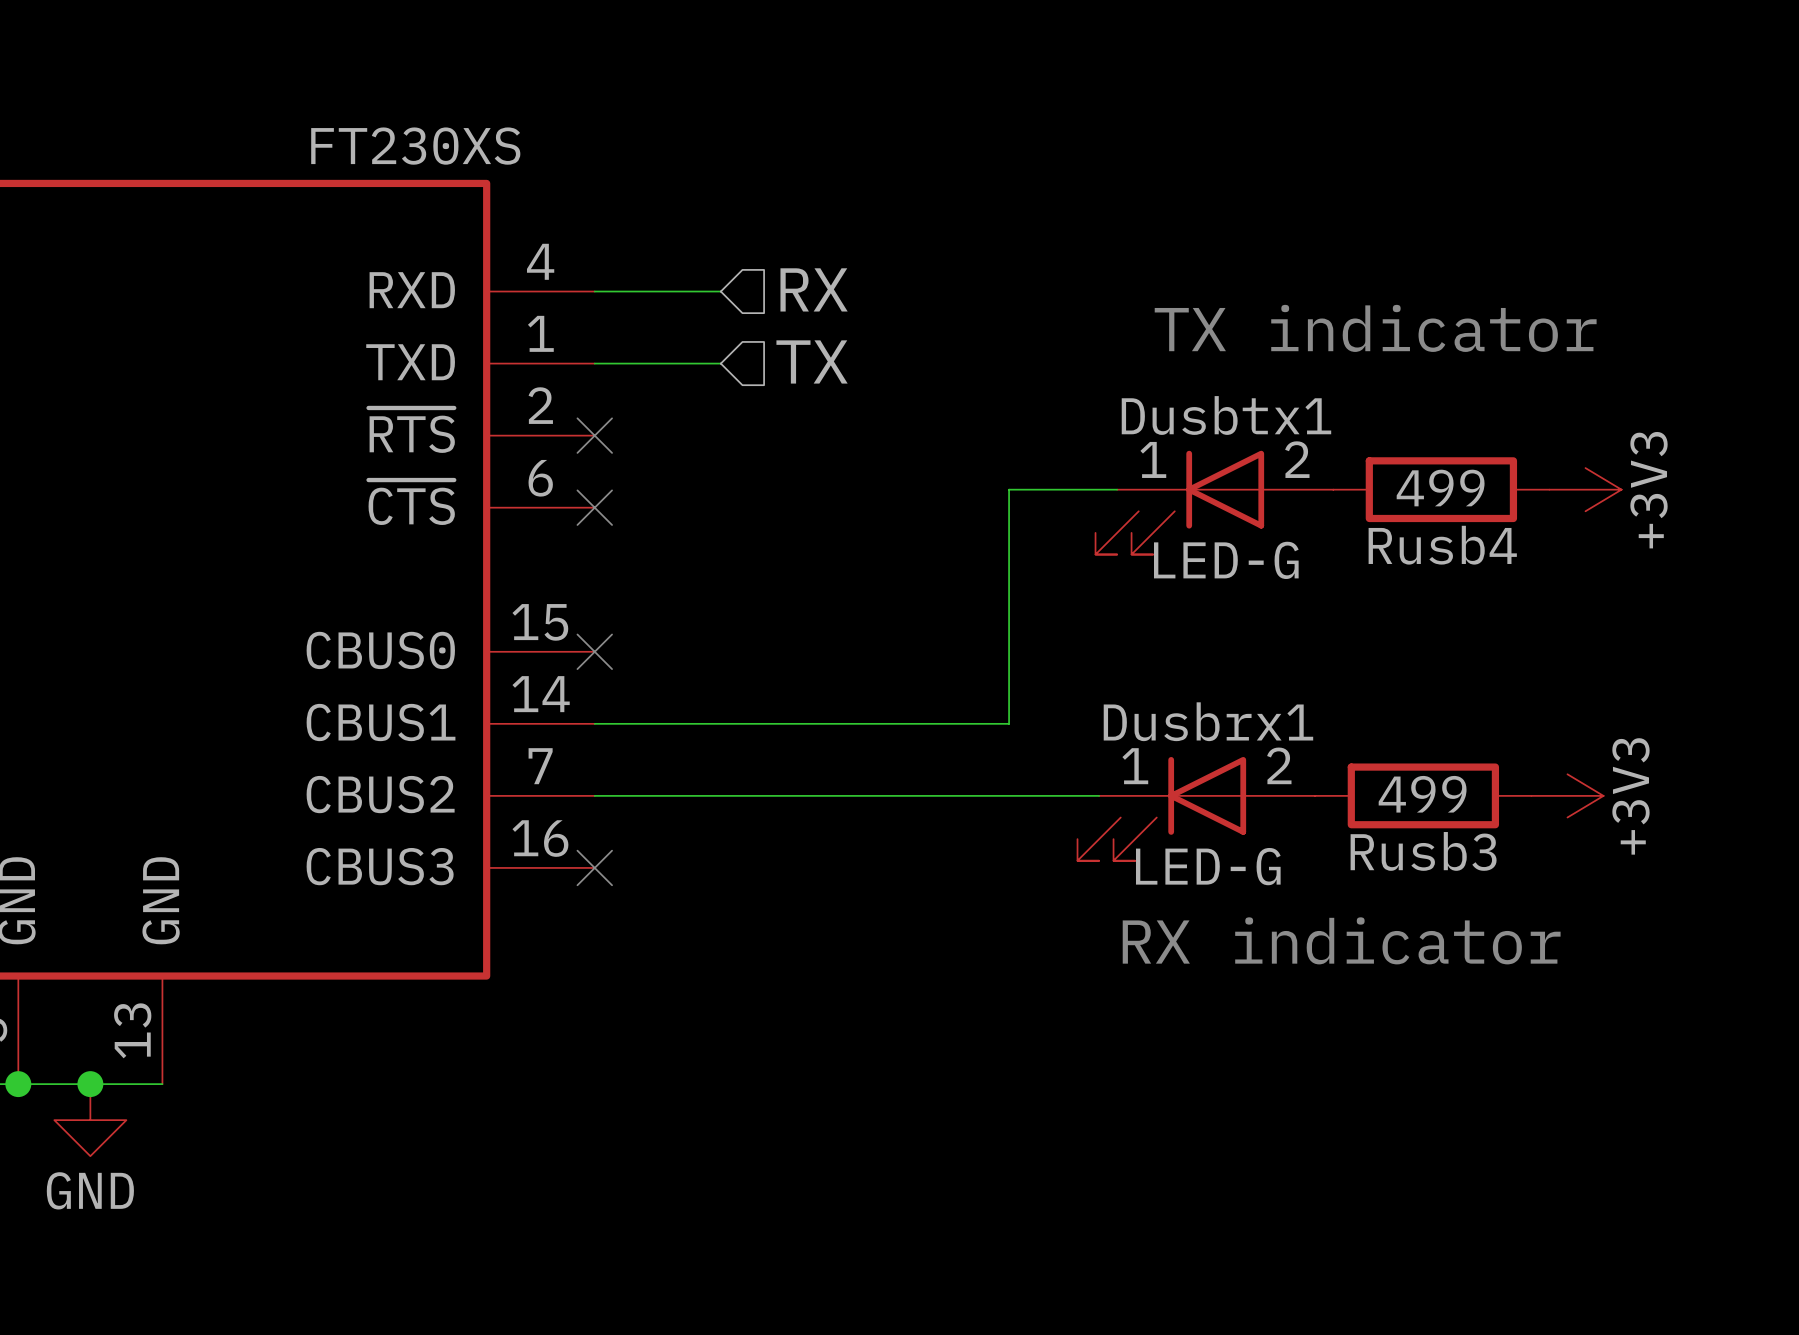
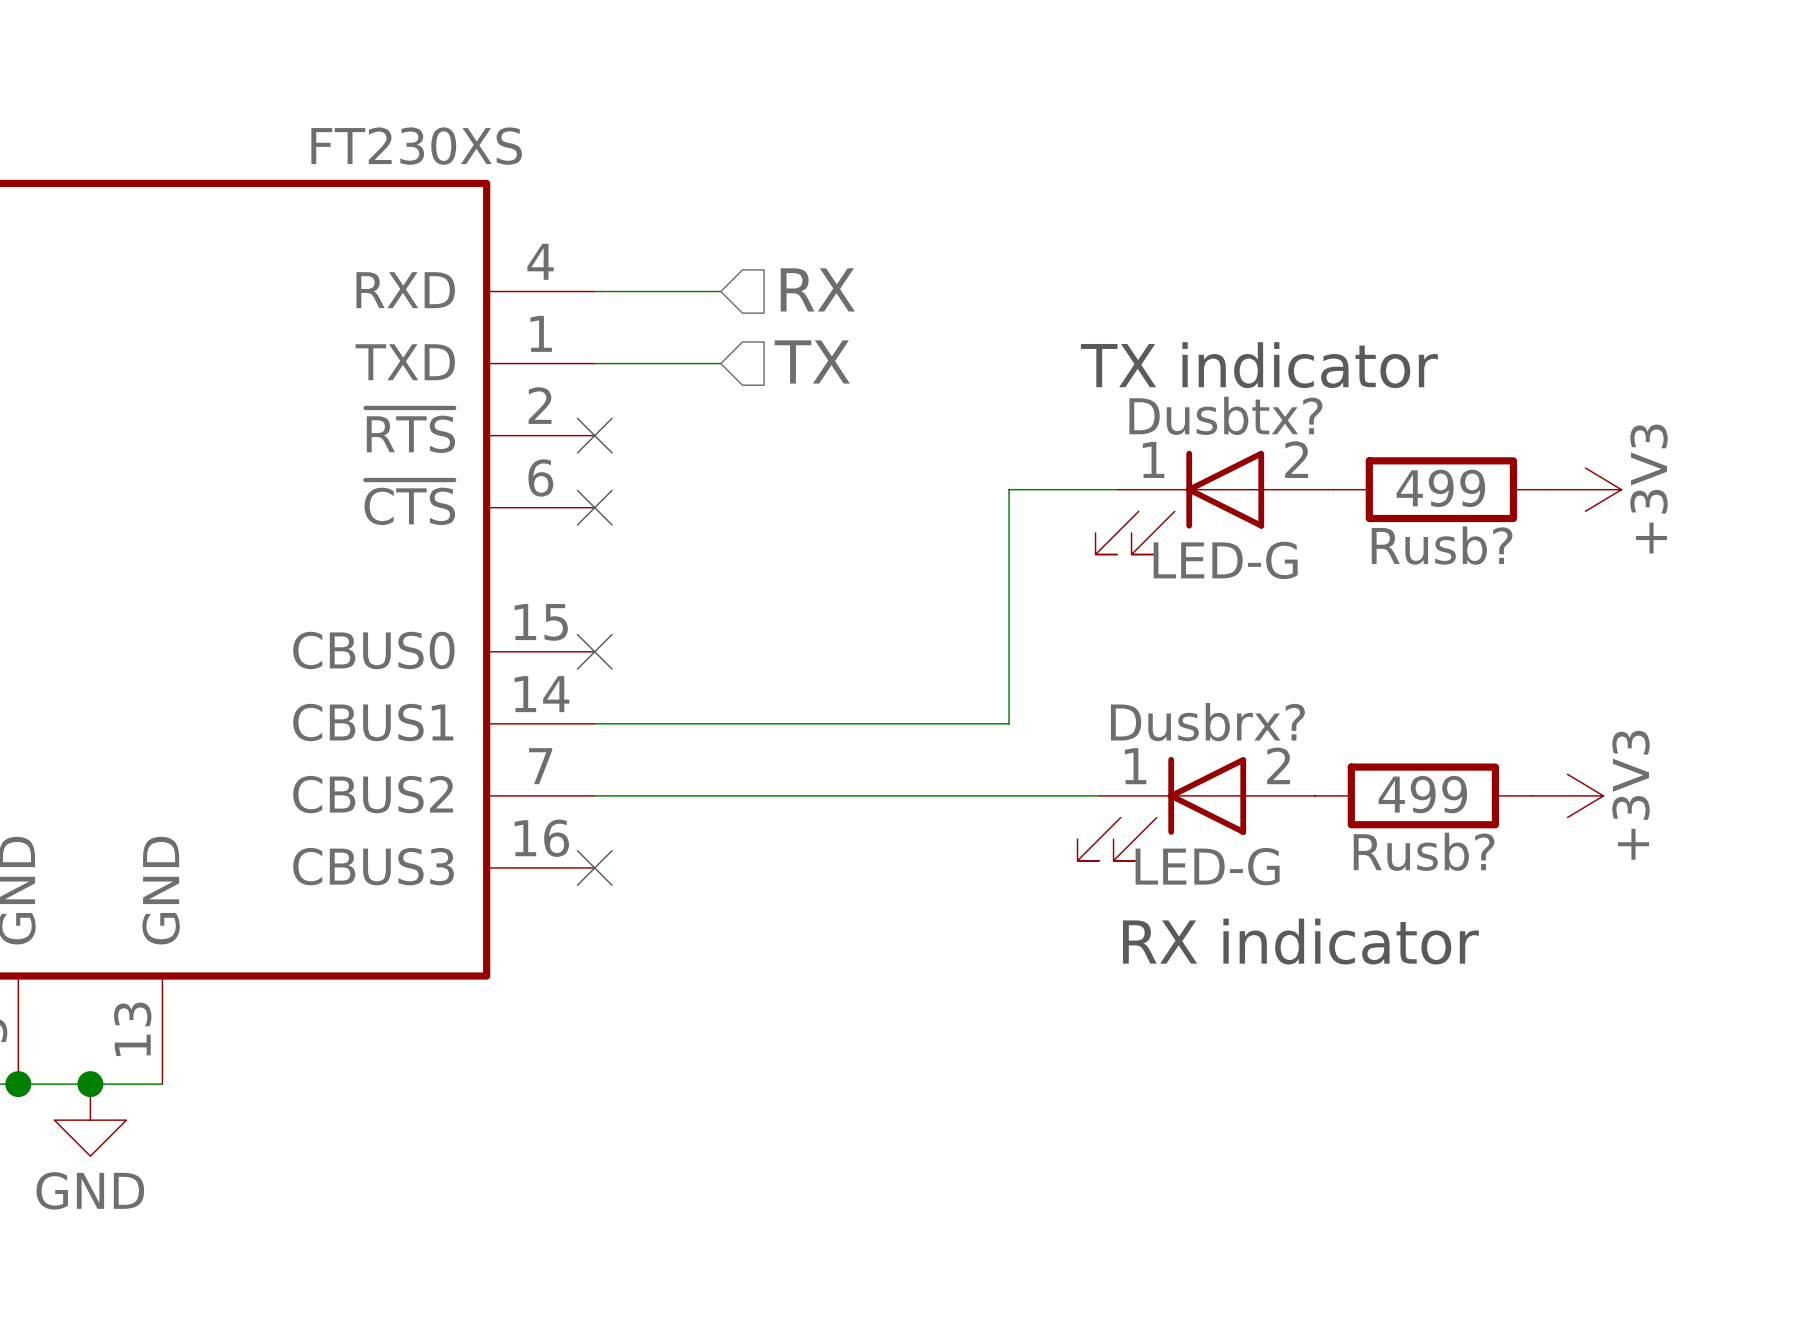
text position: TX indicator (1375, 328) -> TX indicator (1259, 365)
Dusbtx1 name: Dusbtx1 (1226, 415) -> Dusbtx? (1225, 415)
Rusb4 name: Rusb4 (1442, 545) -> Rusb? (1442, 545)
Dusbrx1 name: Dusbrx1 (1208, 721) -> Dusbrx? (1207, 722)
Rusb3 name: Rusb3 (1423, 851) -> Rusb? (1424, 851)

